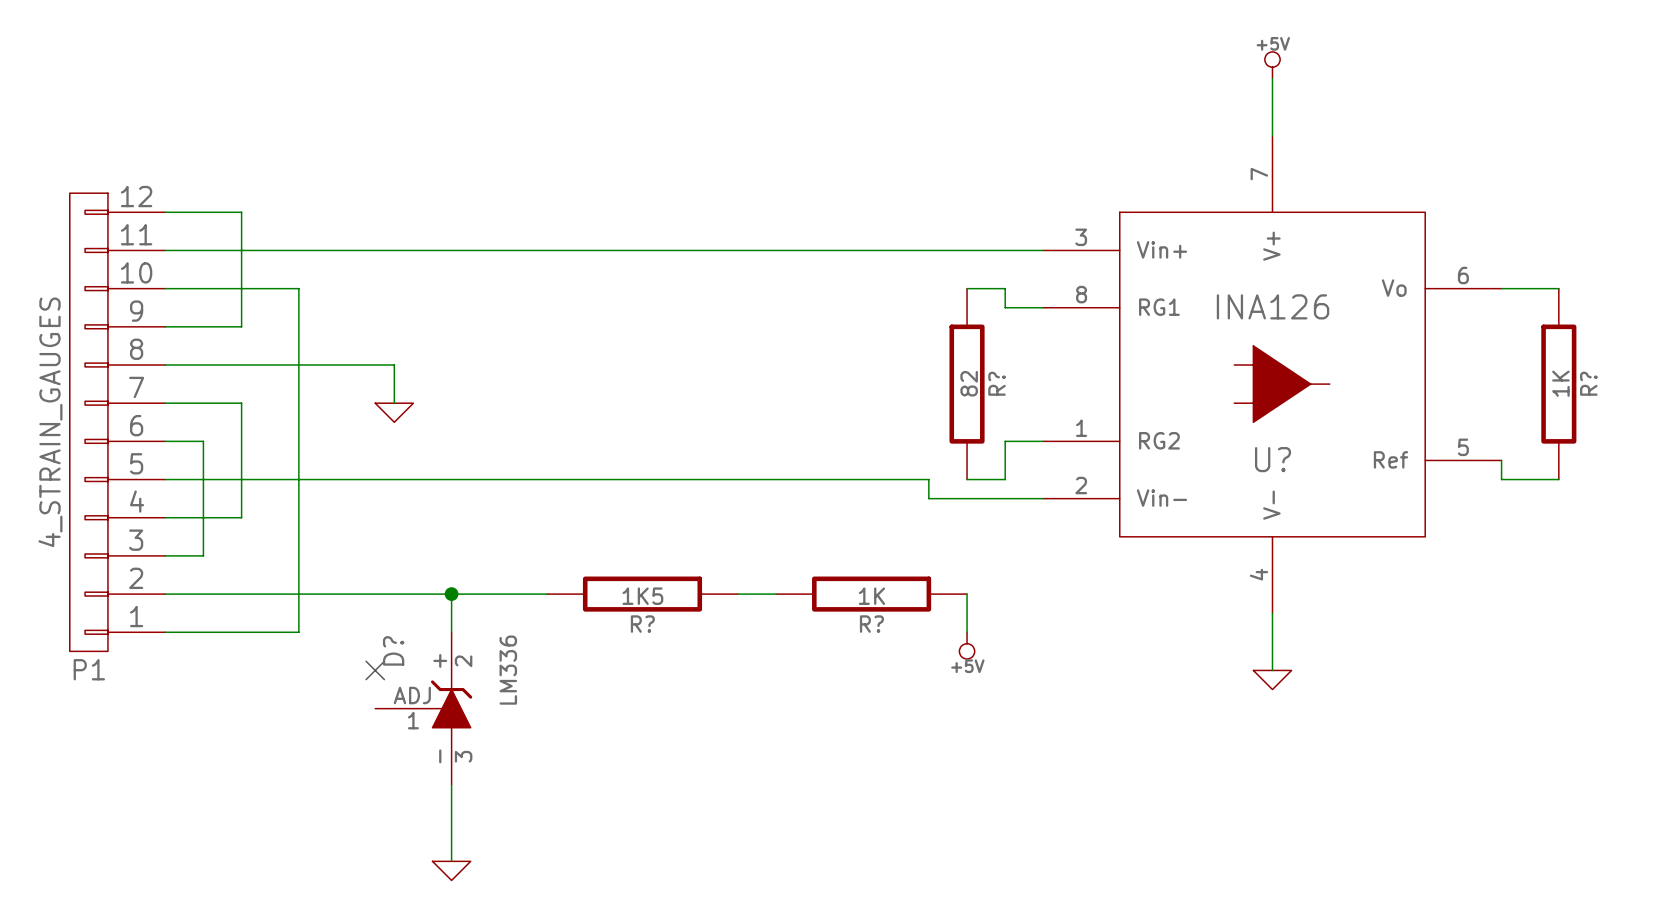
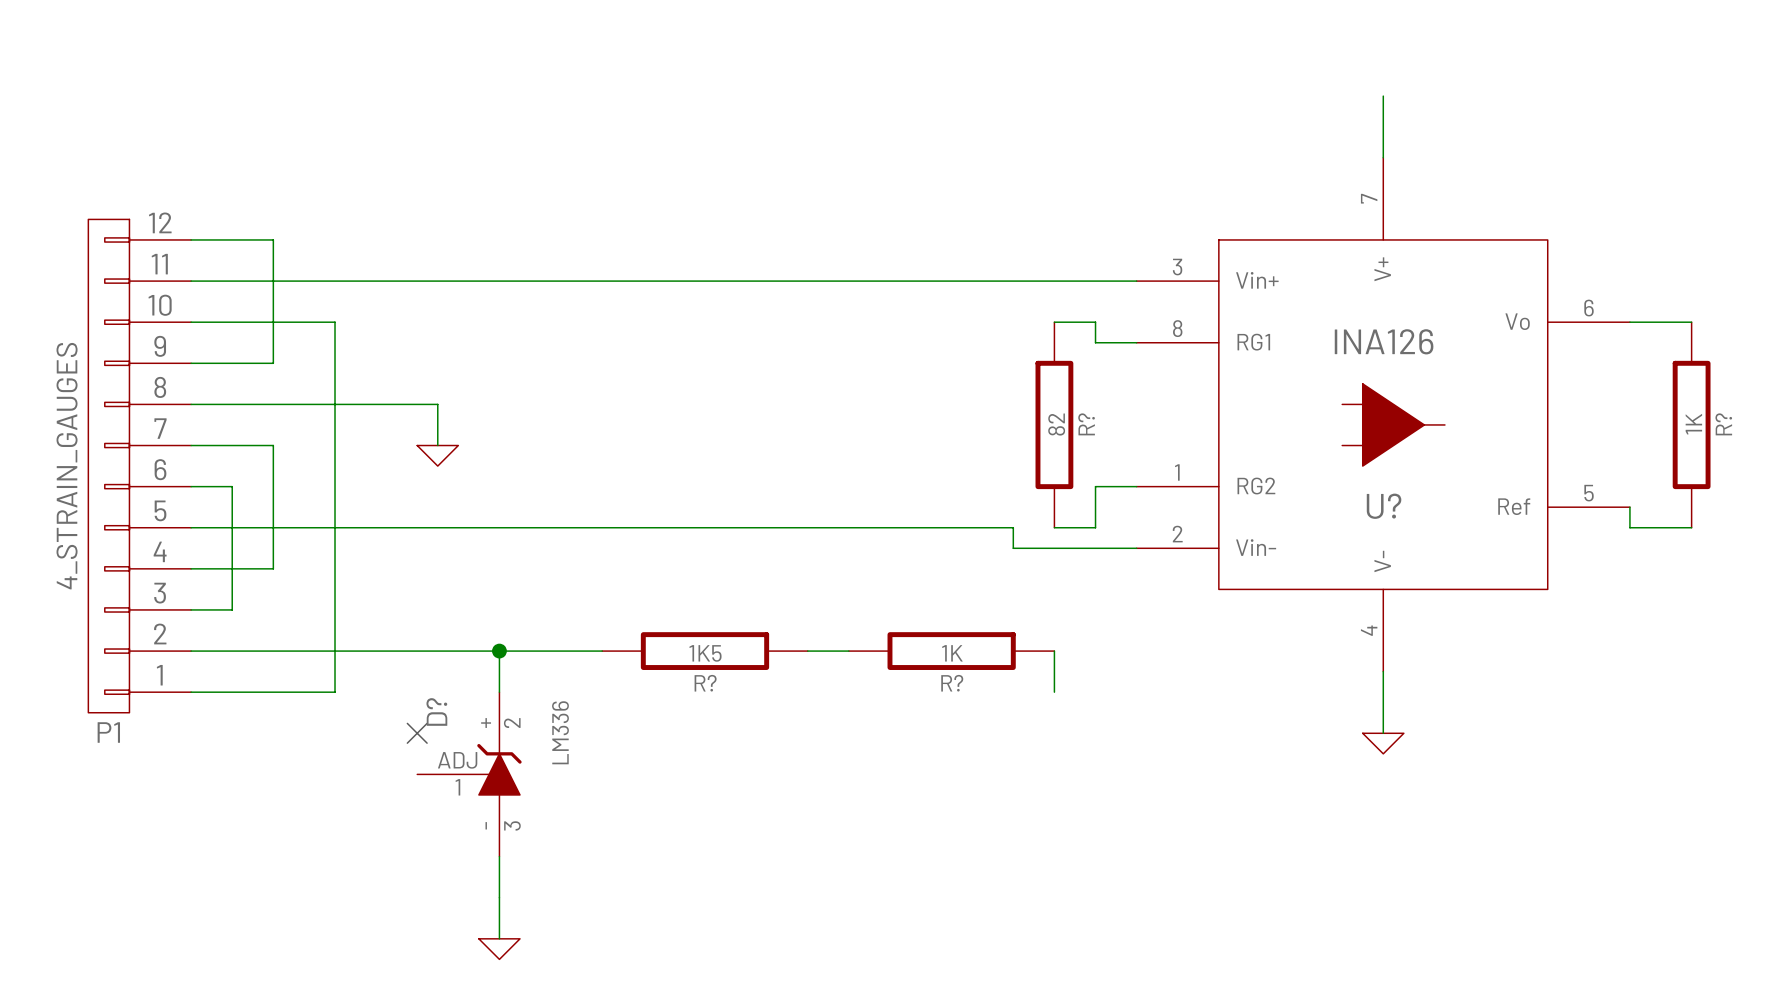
power symbol: +5V (1272, 65) -> none
power symbol: +5V (967, 645) -> none

